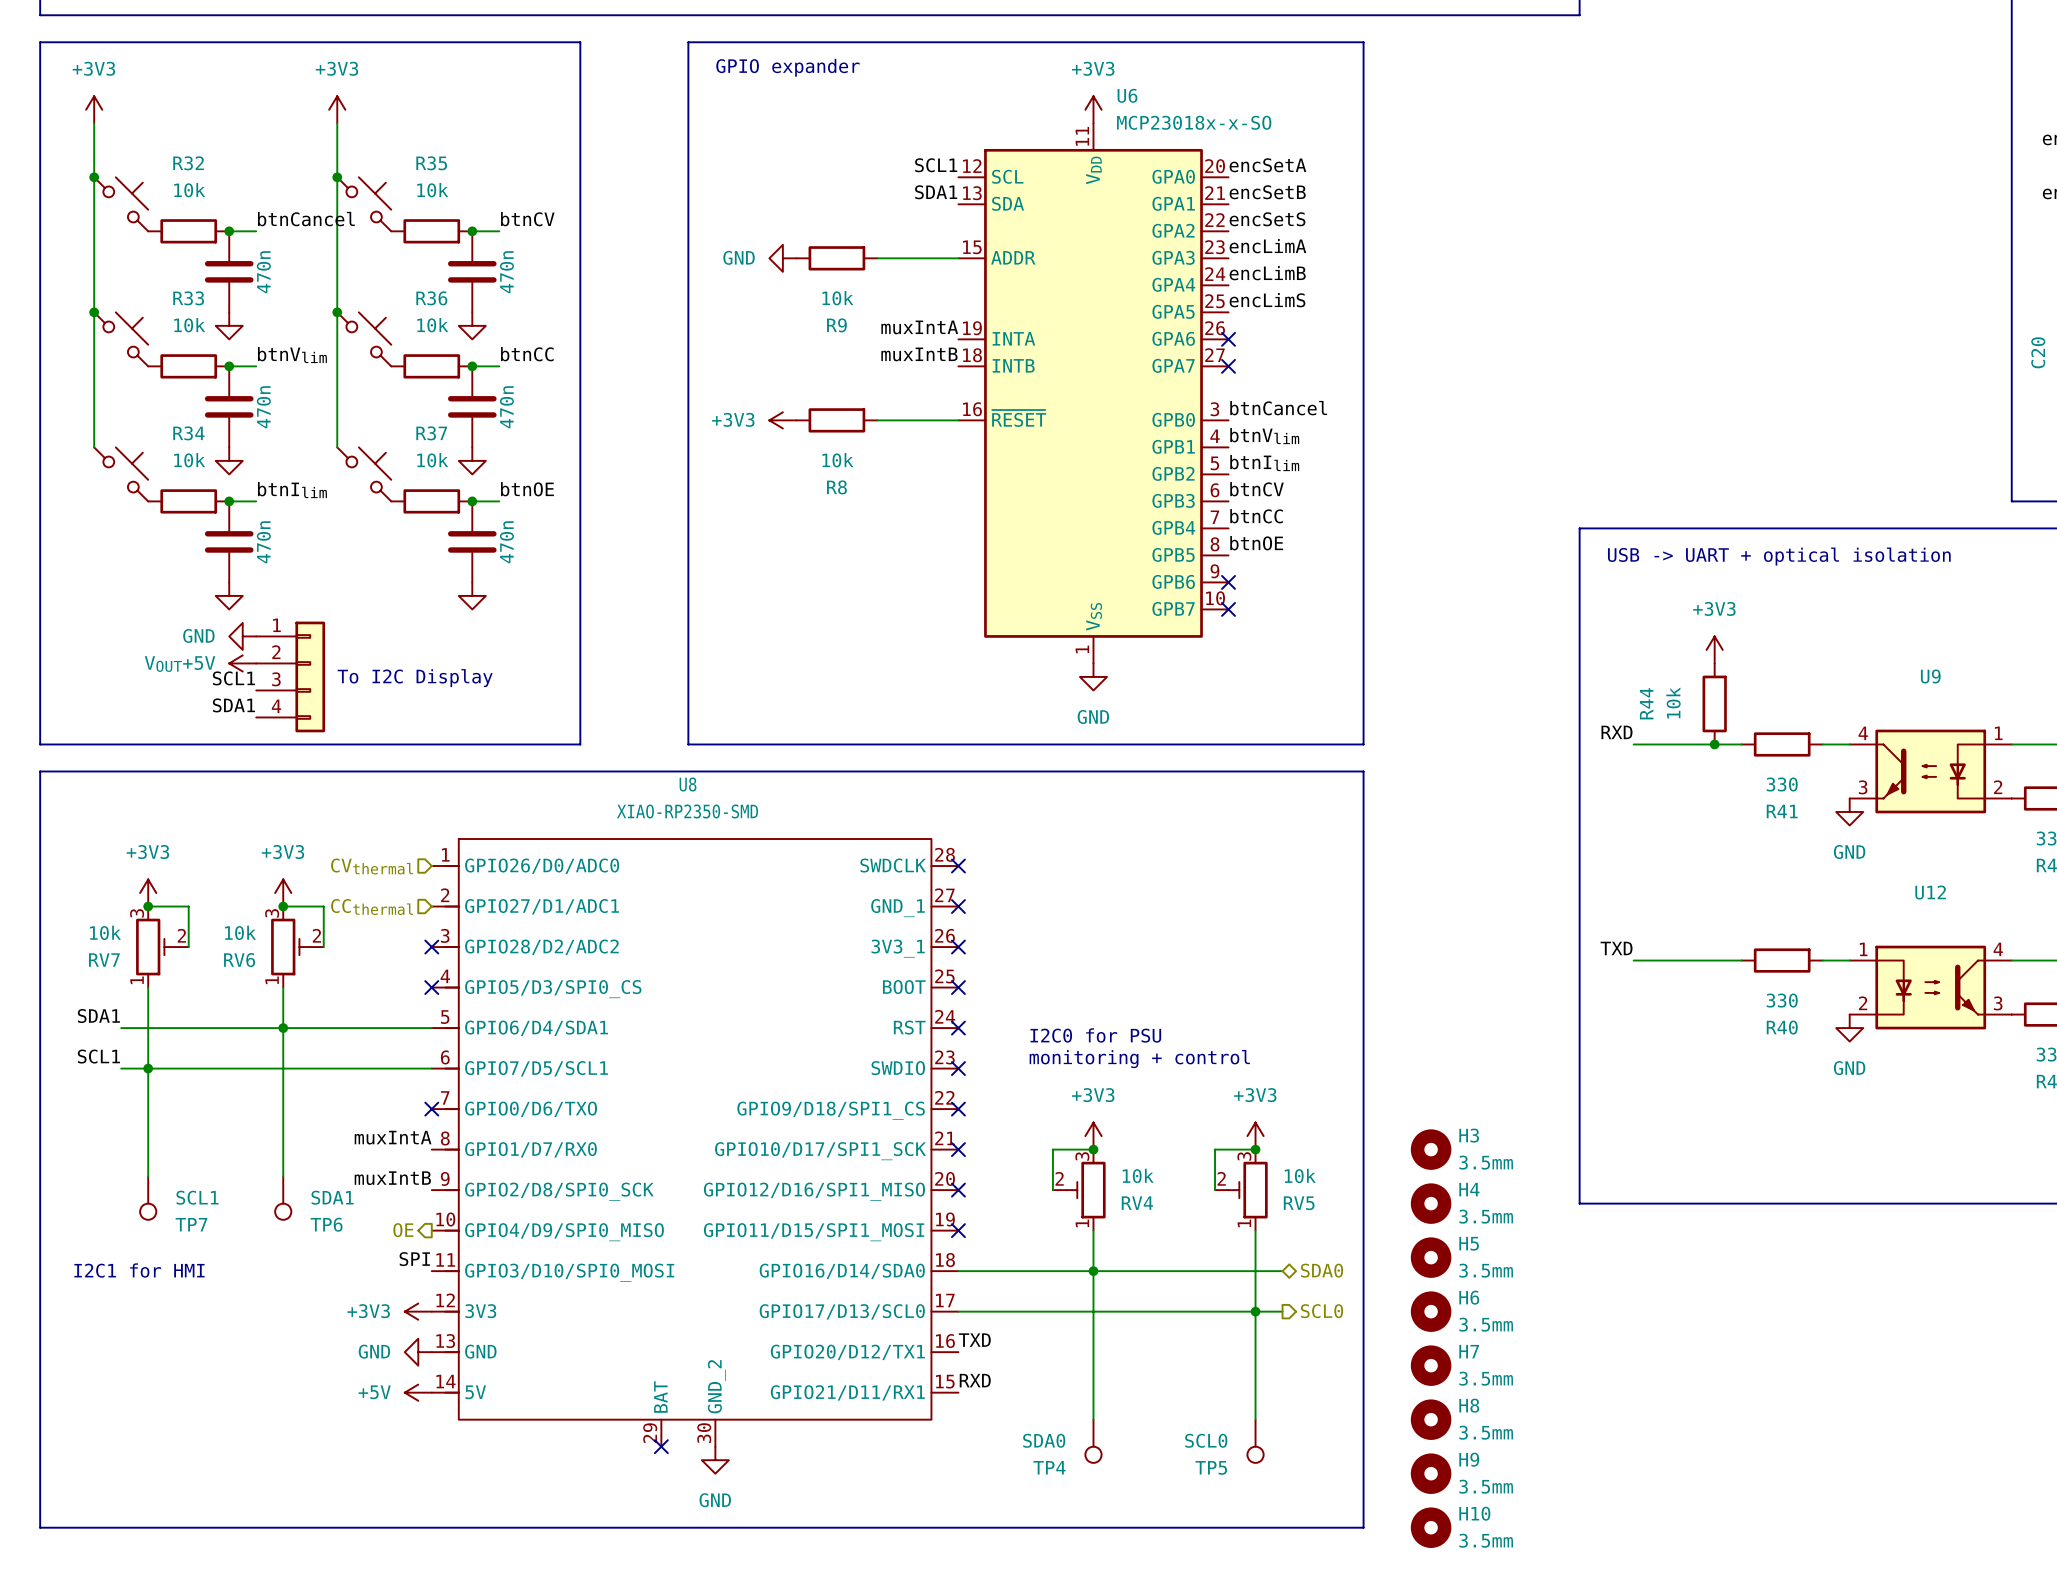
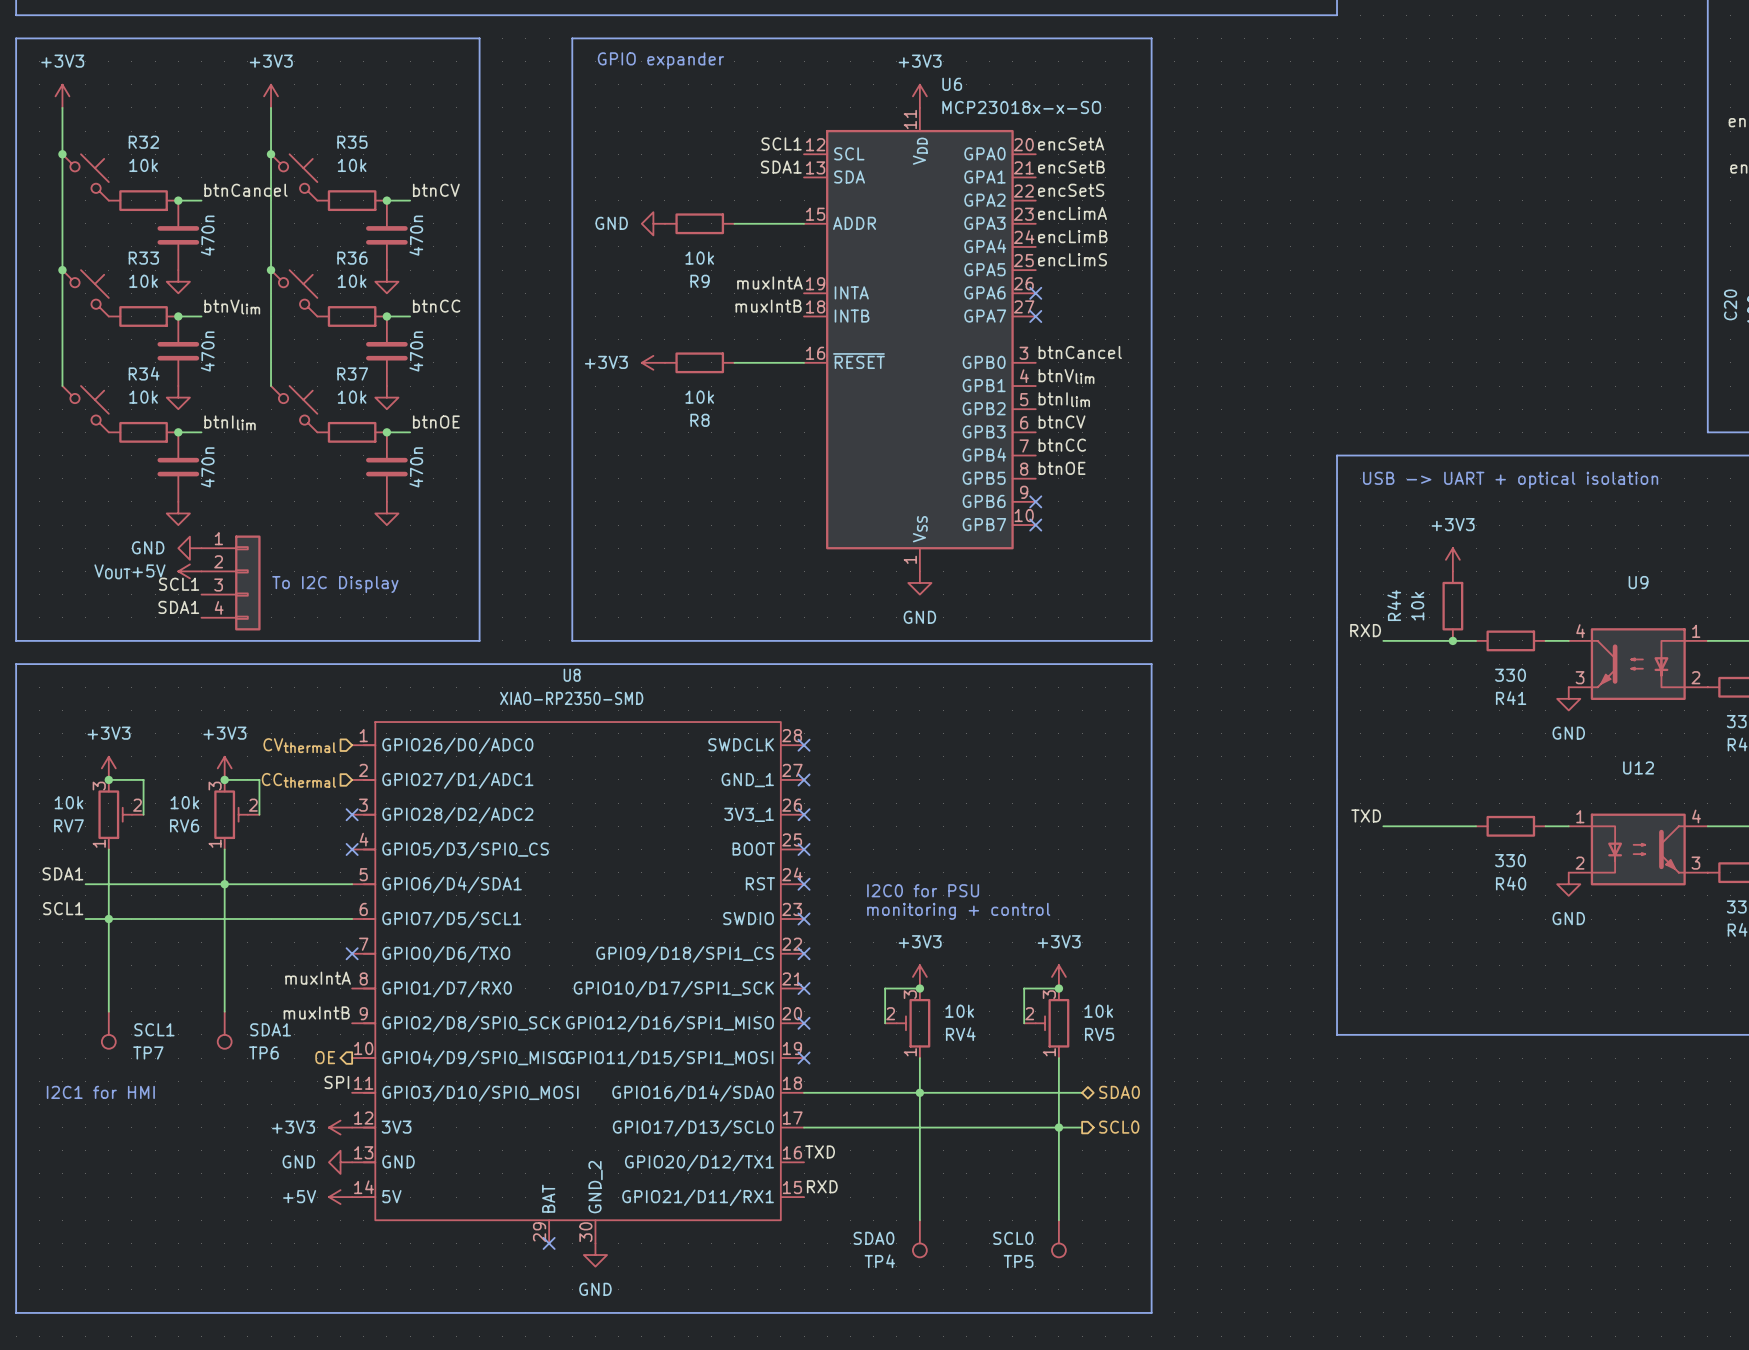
H3: 3.5mm (1431, 1149) -> none
H4: 3.5mm (1431, 1203) -> none
H5: 3.5mm (1431, 1257) -> none
H6: 3.5mm (1431, 1311) -> none
H7: 3.5mm (1431, 1365) -> none
H8: 3.5mm (1431, 1419) -> none
H9: 3.5mm (1431, 1473) -> none
H10: 3.5mm (1431, 1527) -> none

